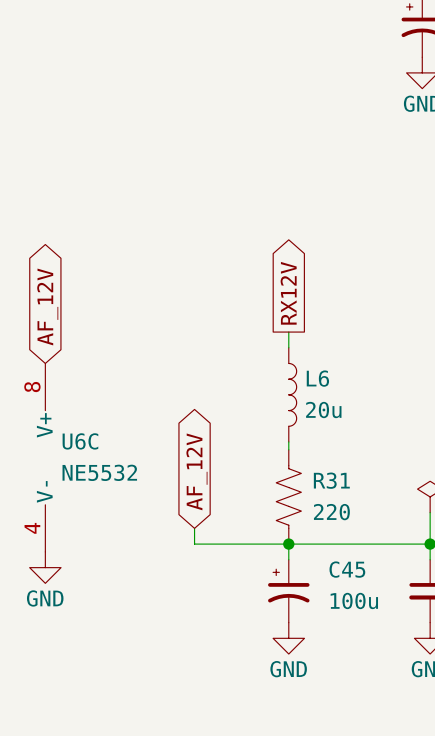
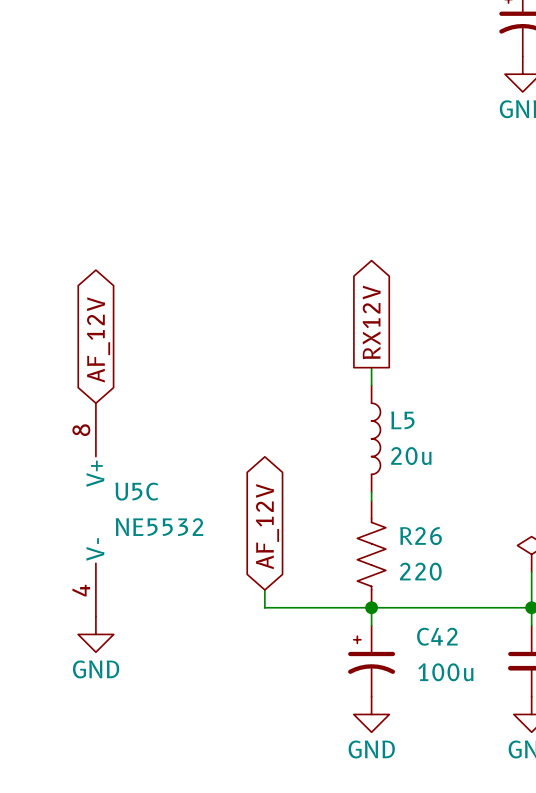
L6 name: L6 (317, 378) -> L5 (402, 420)
U6C name: U6C (80, 441) -> U5C (136, 491)
R31 name: R31 (331, 480) -> R26 (420, 536)
C45 name: C45 (347, 569) -> C42 (437, 636)

